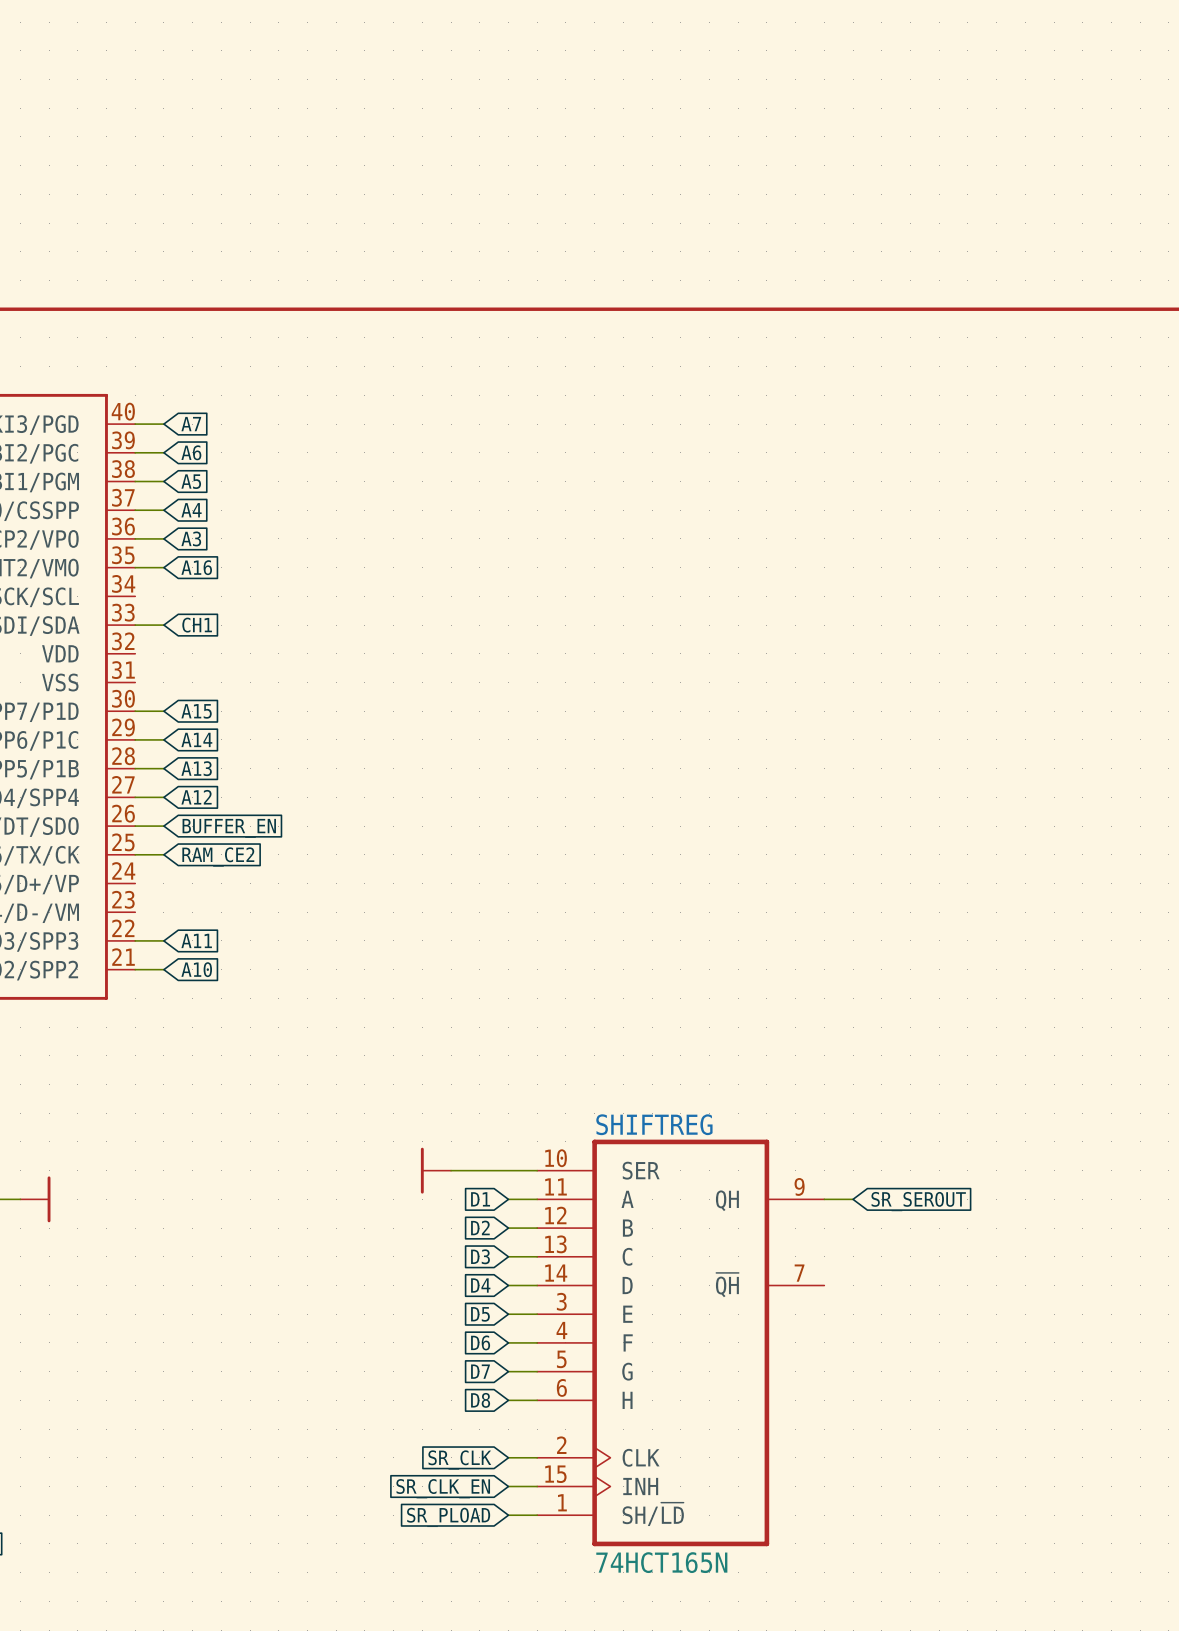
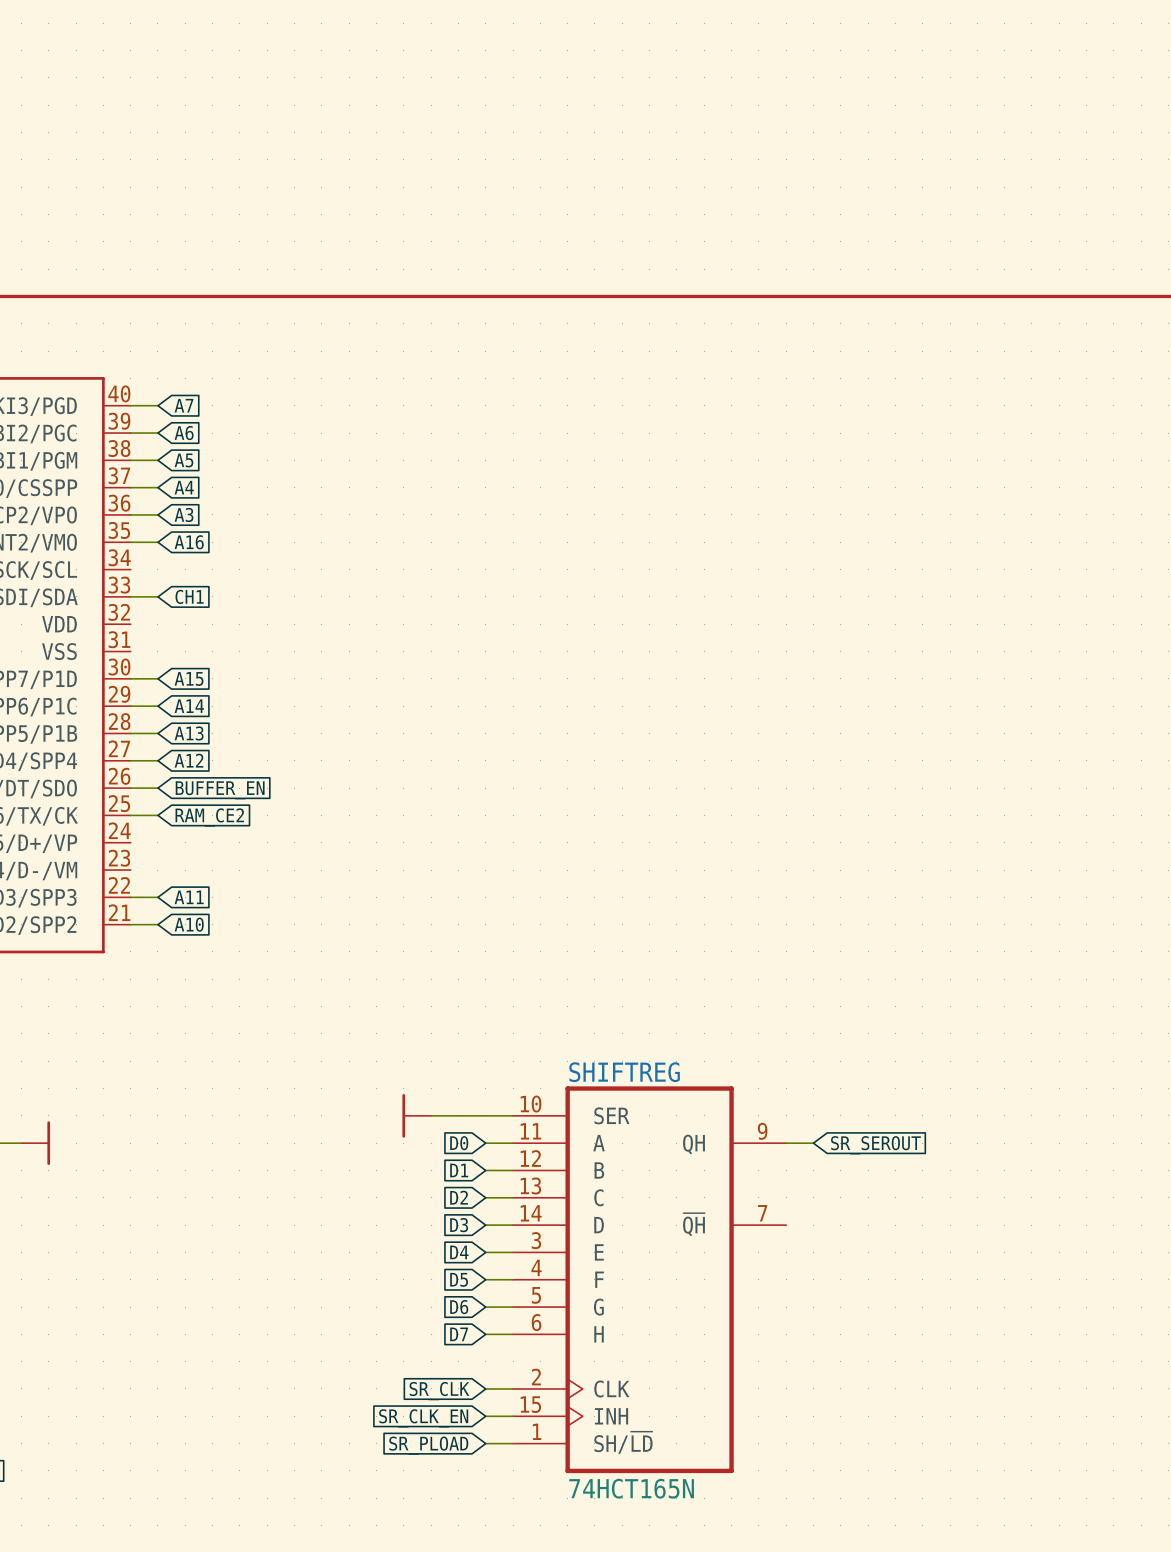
global label: D1 (480, 1199) -> D0 (459, 1143)
global label: D2 (480, 1227) -> D1 (459, 1170)
global label: D3 (480, 1256) -> D2 (459, 1197)
global label: D4 (480, 1285) -> D3 (459, 1225)
global label: D5 (480, 1314) -> D4 (459, 1252)
global label: D6 (480, 1342) -> D5 (459, 1279)
global label: D7 (480, 1371) -> D6 (459, 1307)
global label: D8 (480, 1400) -> D7 (459, 1334)

